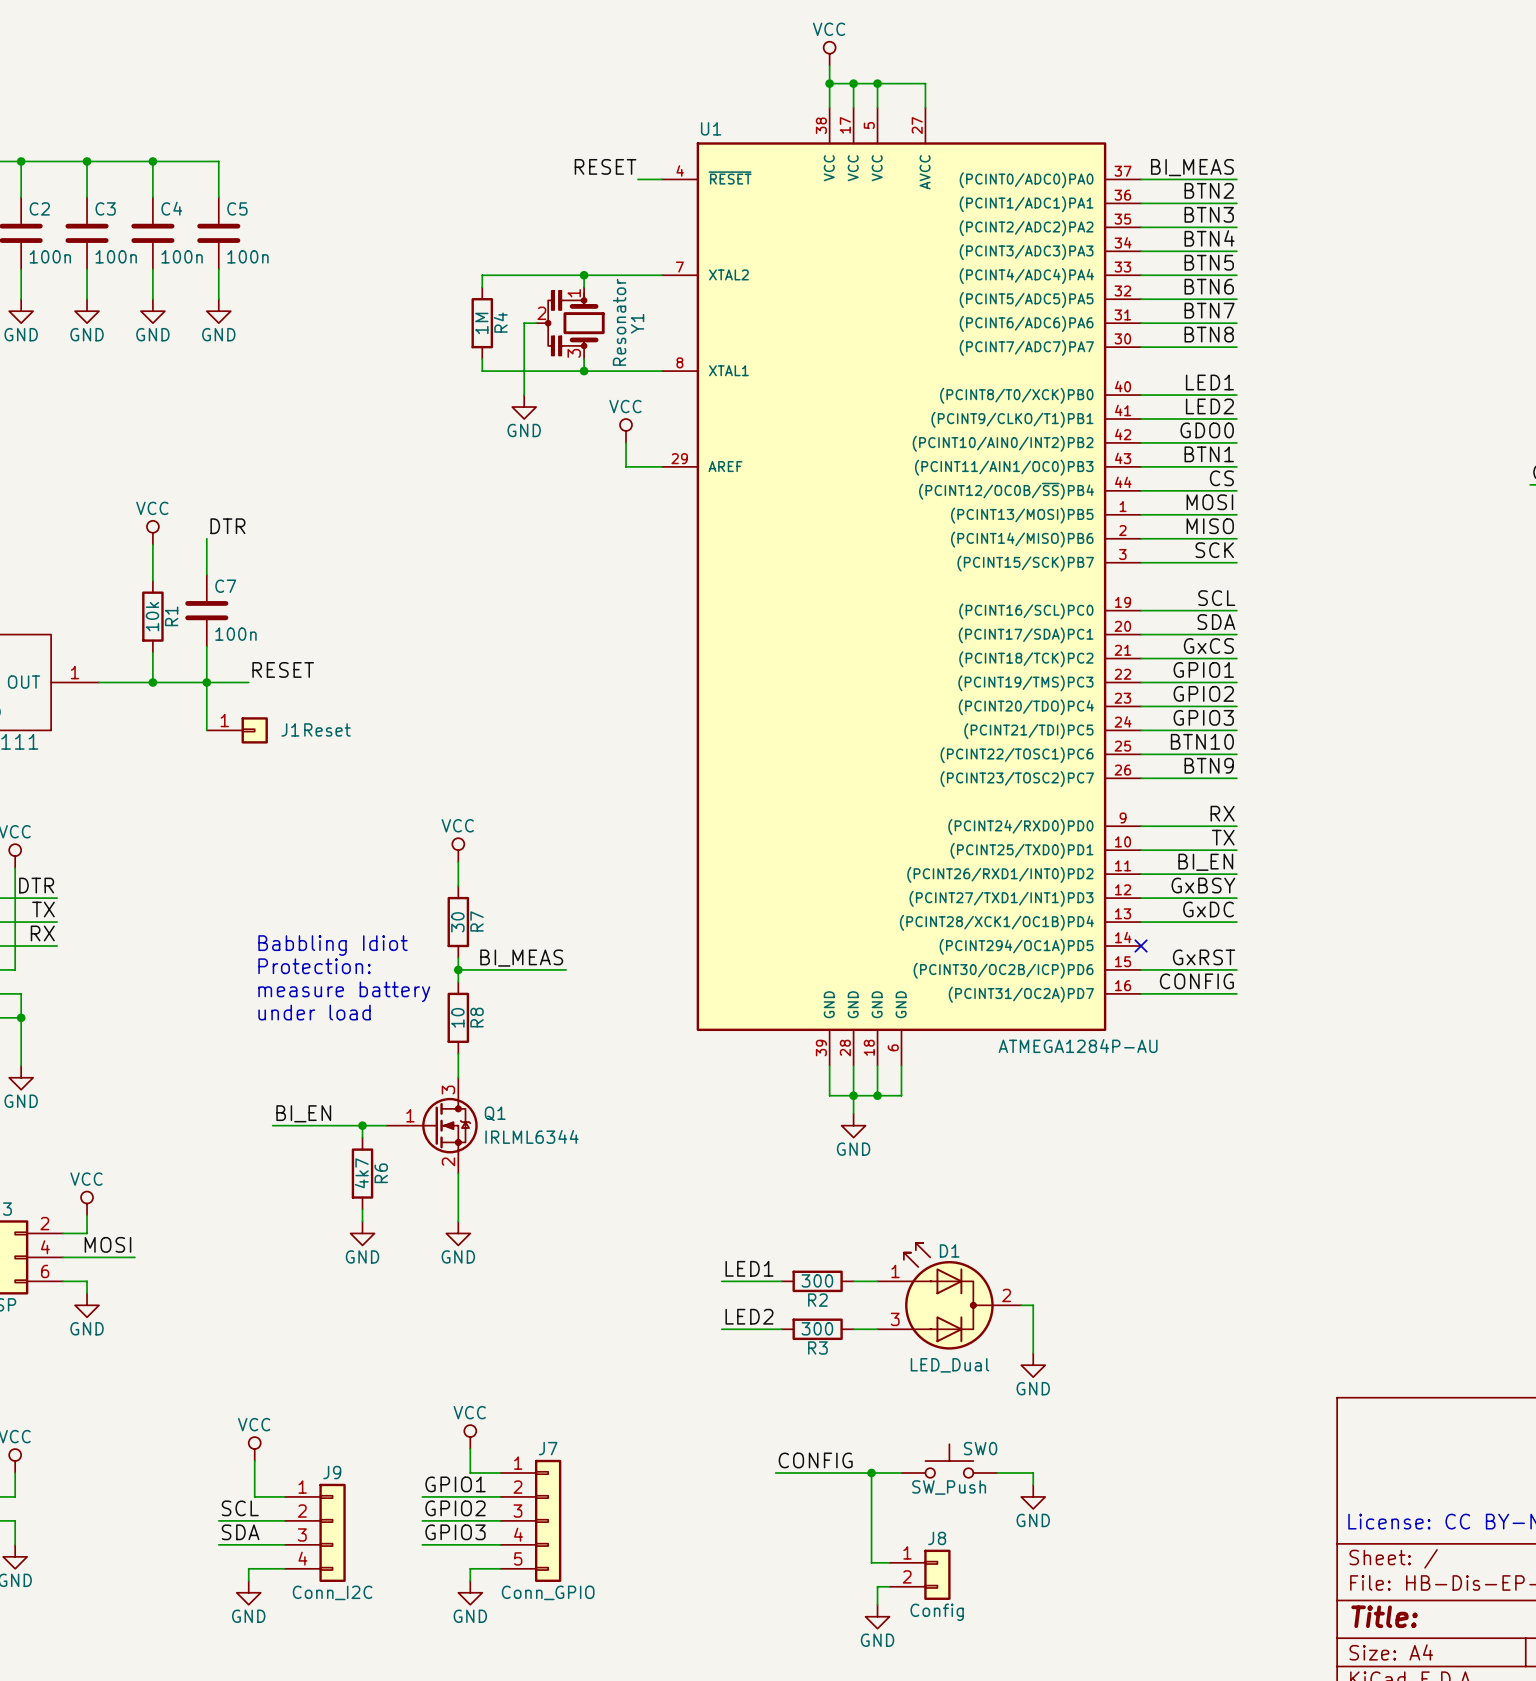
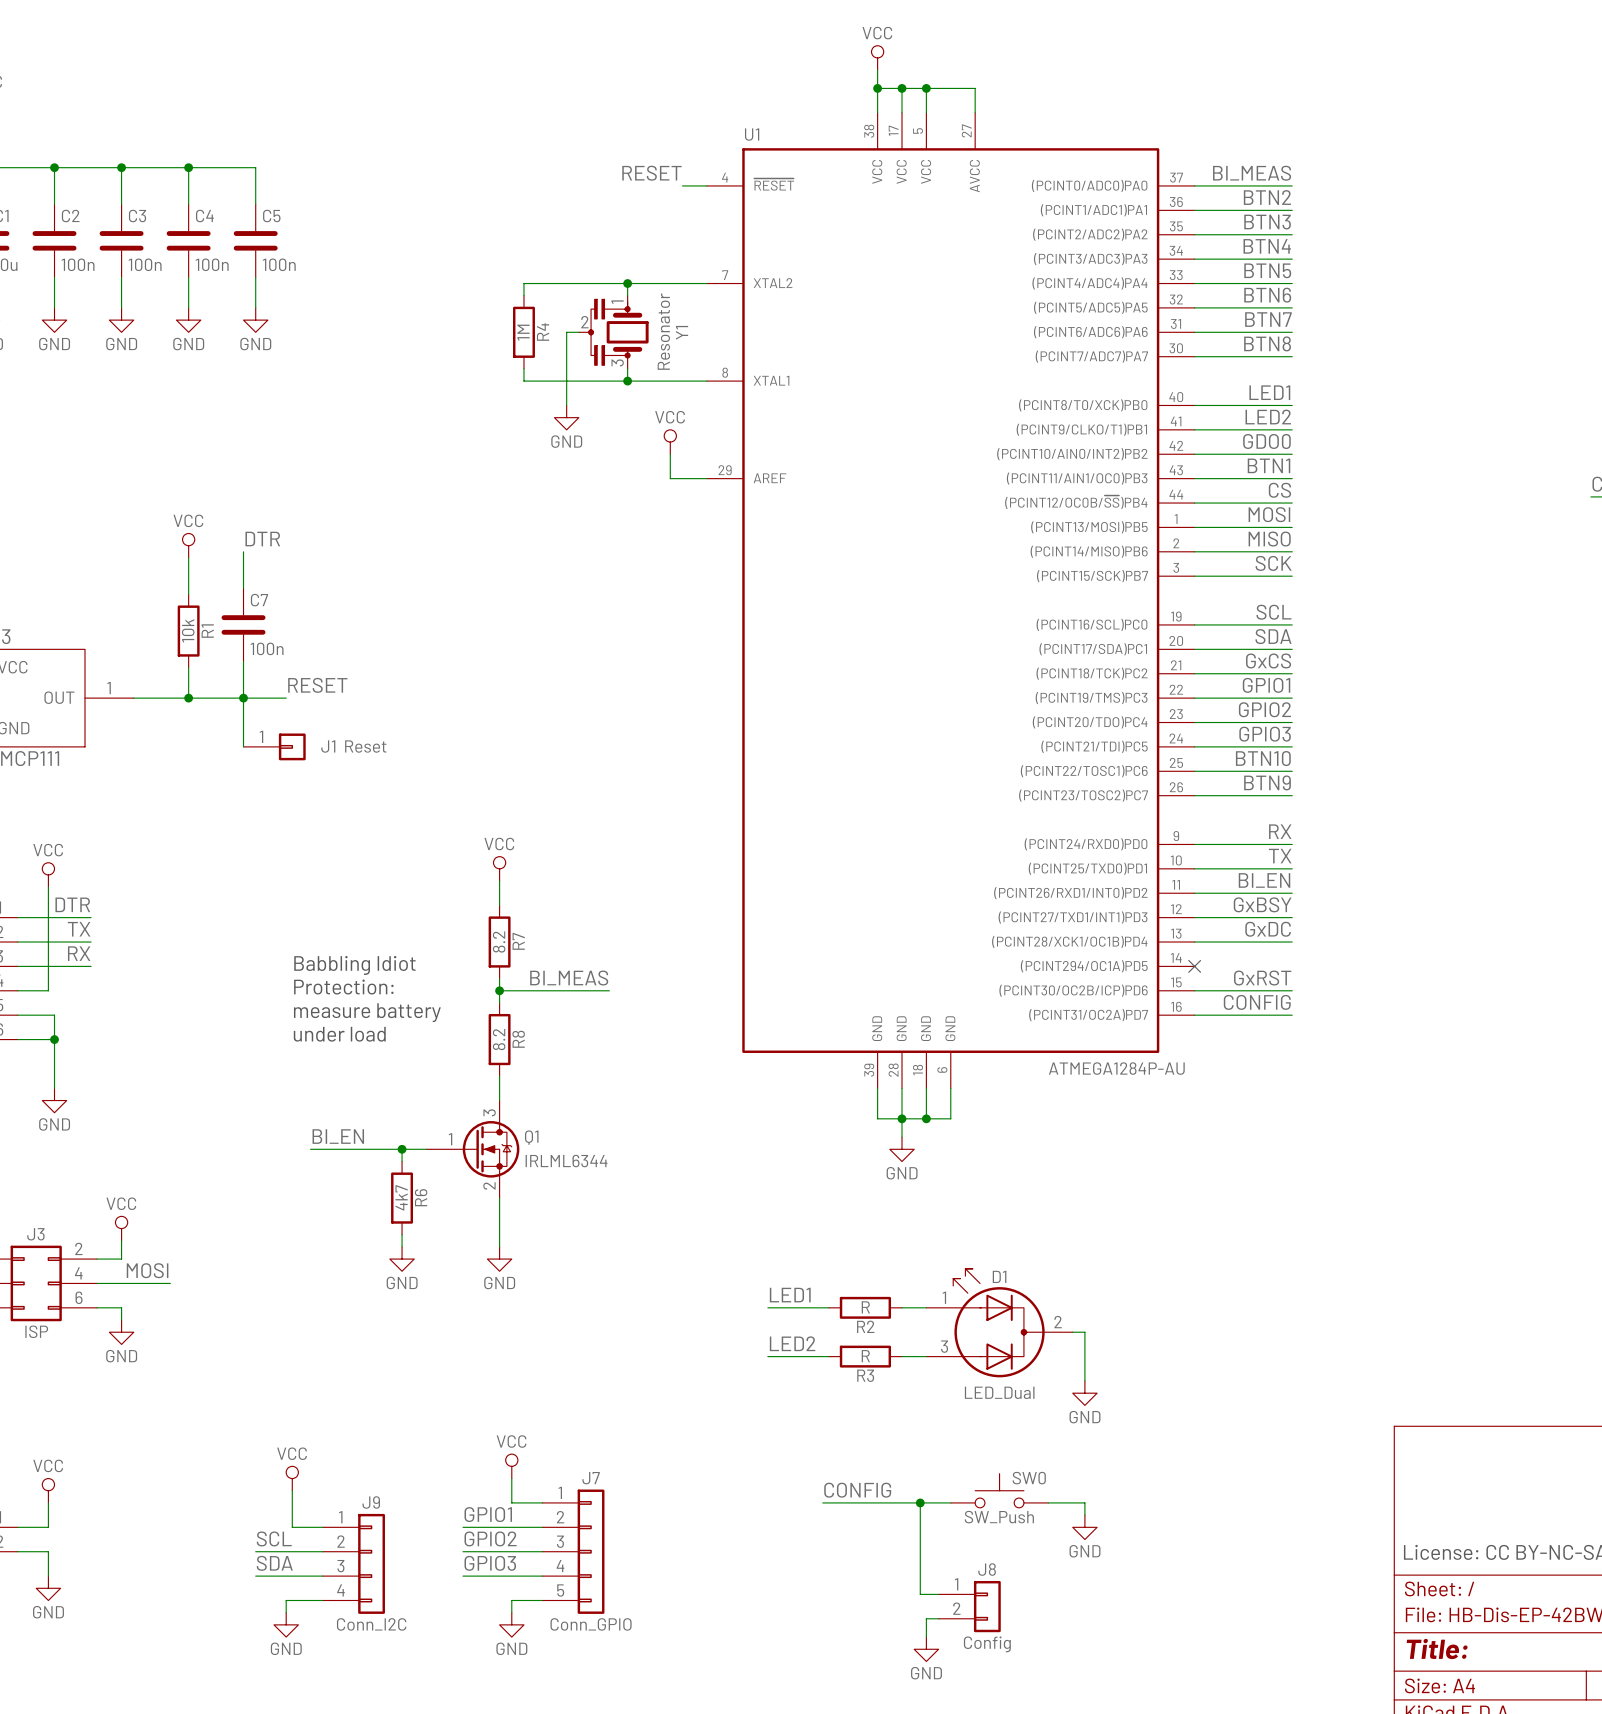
R7 value: 30 (457, 922) -> 8.2 (499, 942)
R8 value: 10 (457, 1017) -> 8.2 (499, 1039)
R2 value: 300 (817, 1280) -> R (865, 1307)
R3 value: 300 (817, 1328) -> R (865, 1356)

